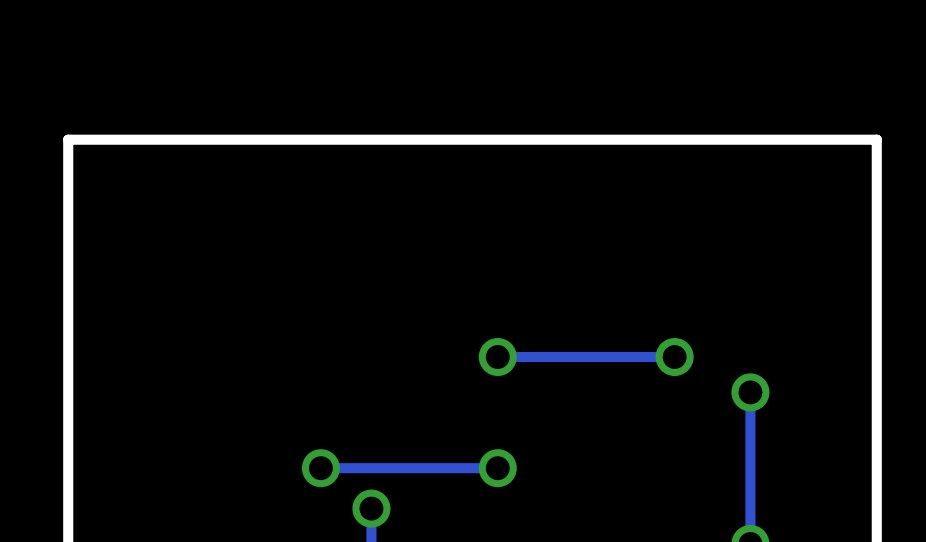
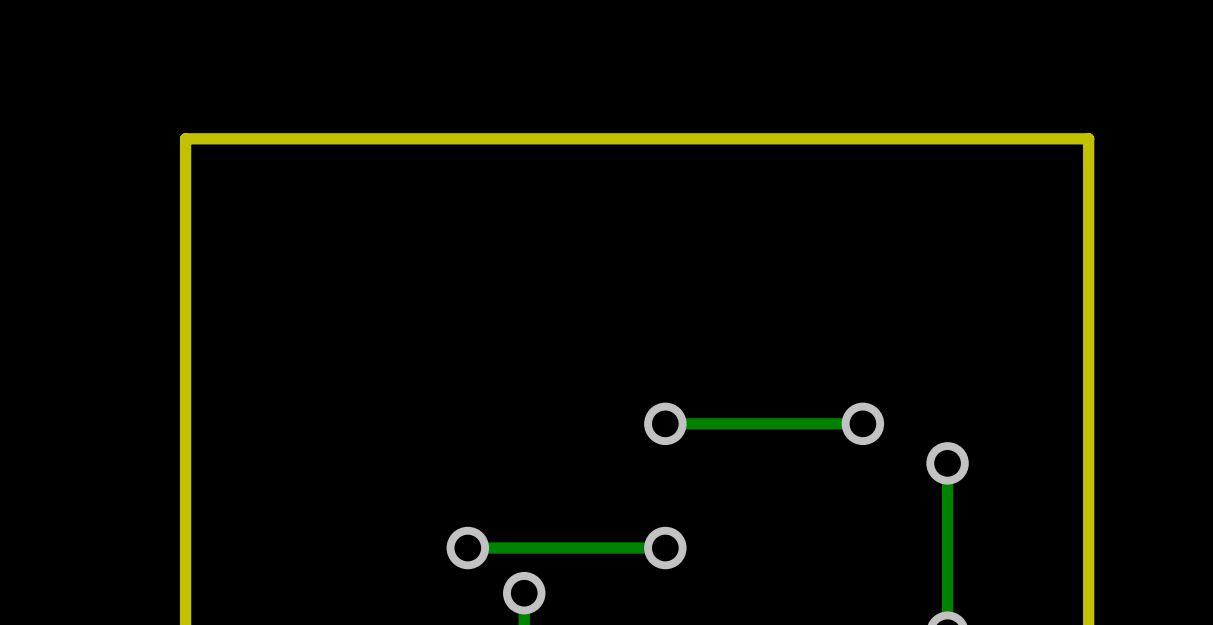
board edge: (876, 139) (68, 139) -> (1088, 181) (1088, 138) (185, 138) (185, 181)

